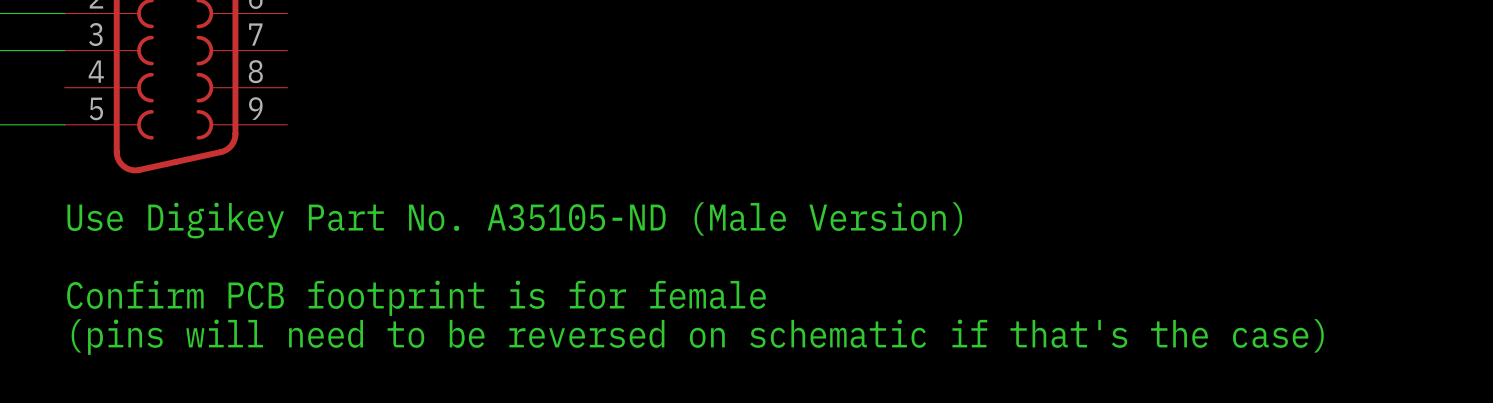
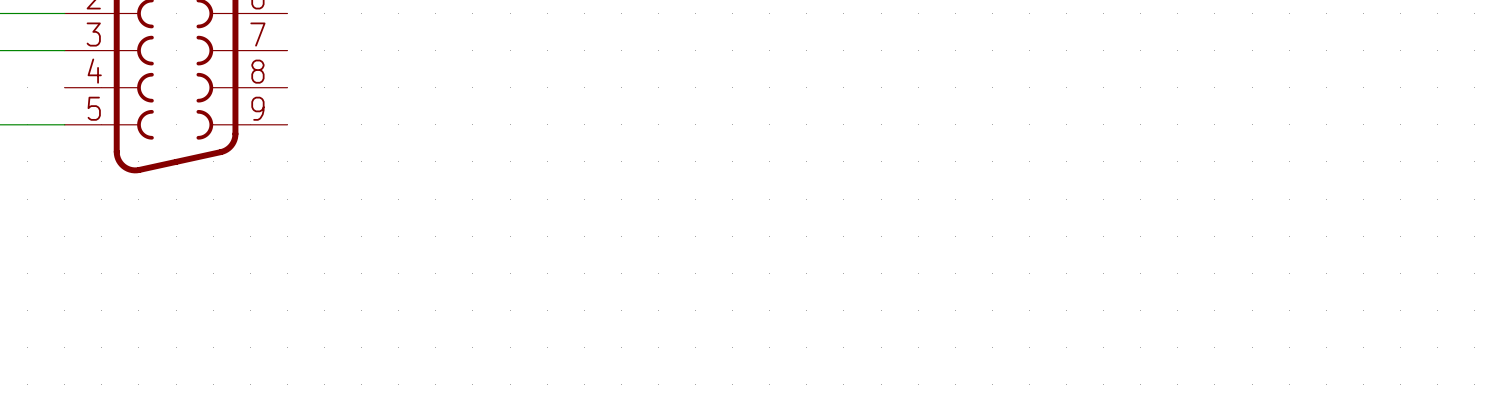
text: Use Digikey Part No. A35105-ND (Male Version) (514, 220) -> none
text: Confirm PCB footprint is for female (416, 298) -> none
text: (pins will need to be reversed on schematic if that's the case) (697, 336) -> none

